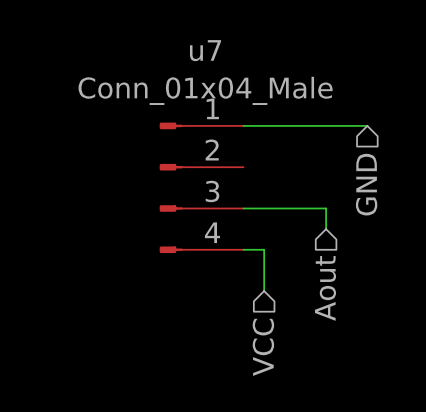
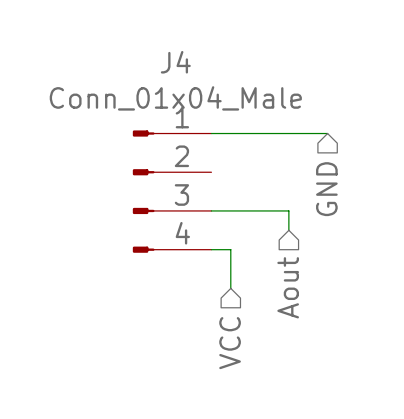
u7 name: u7 (205, 50) -> J4 (175, 62)

